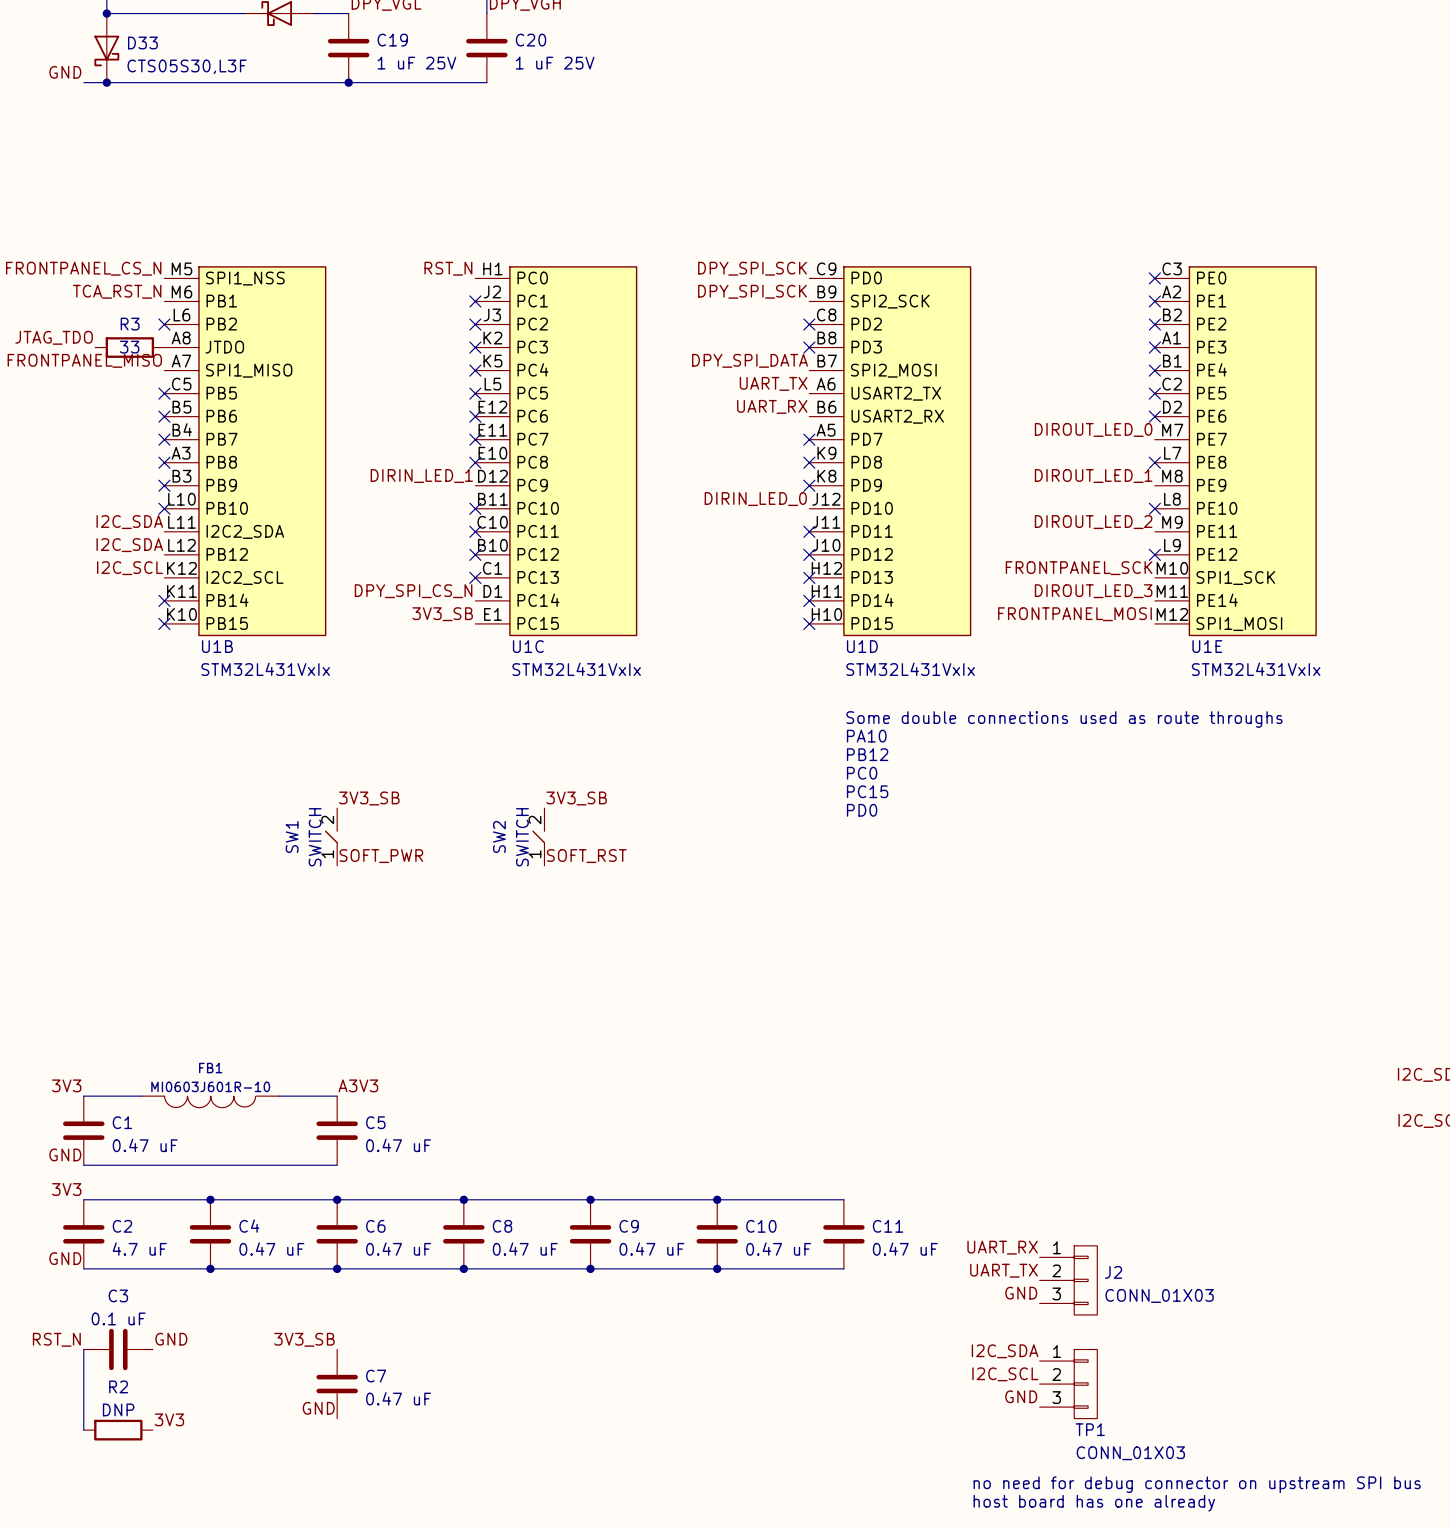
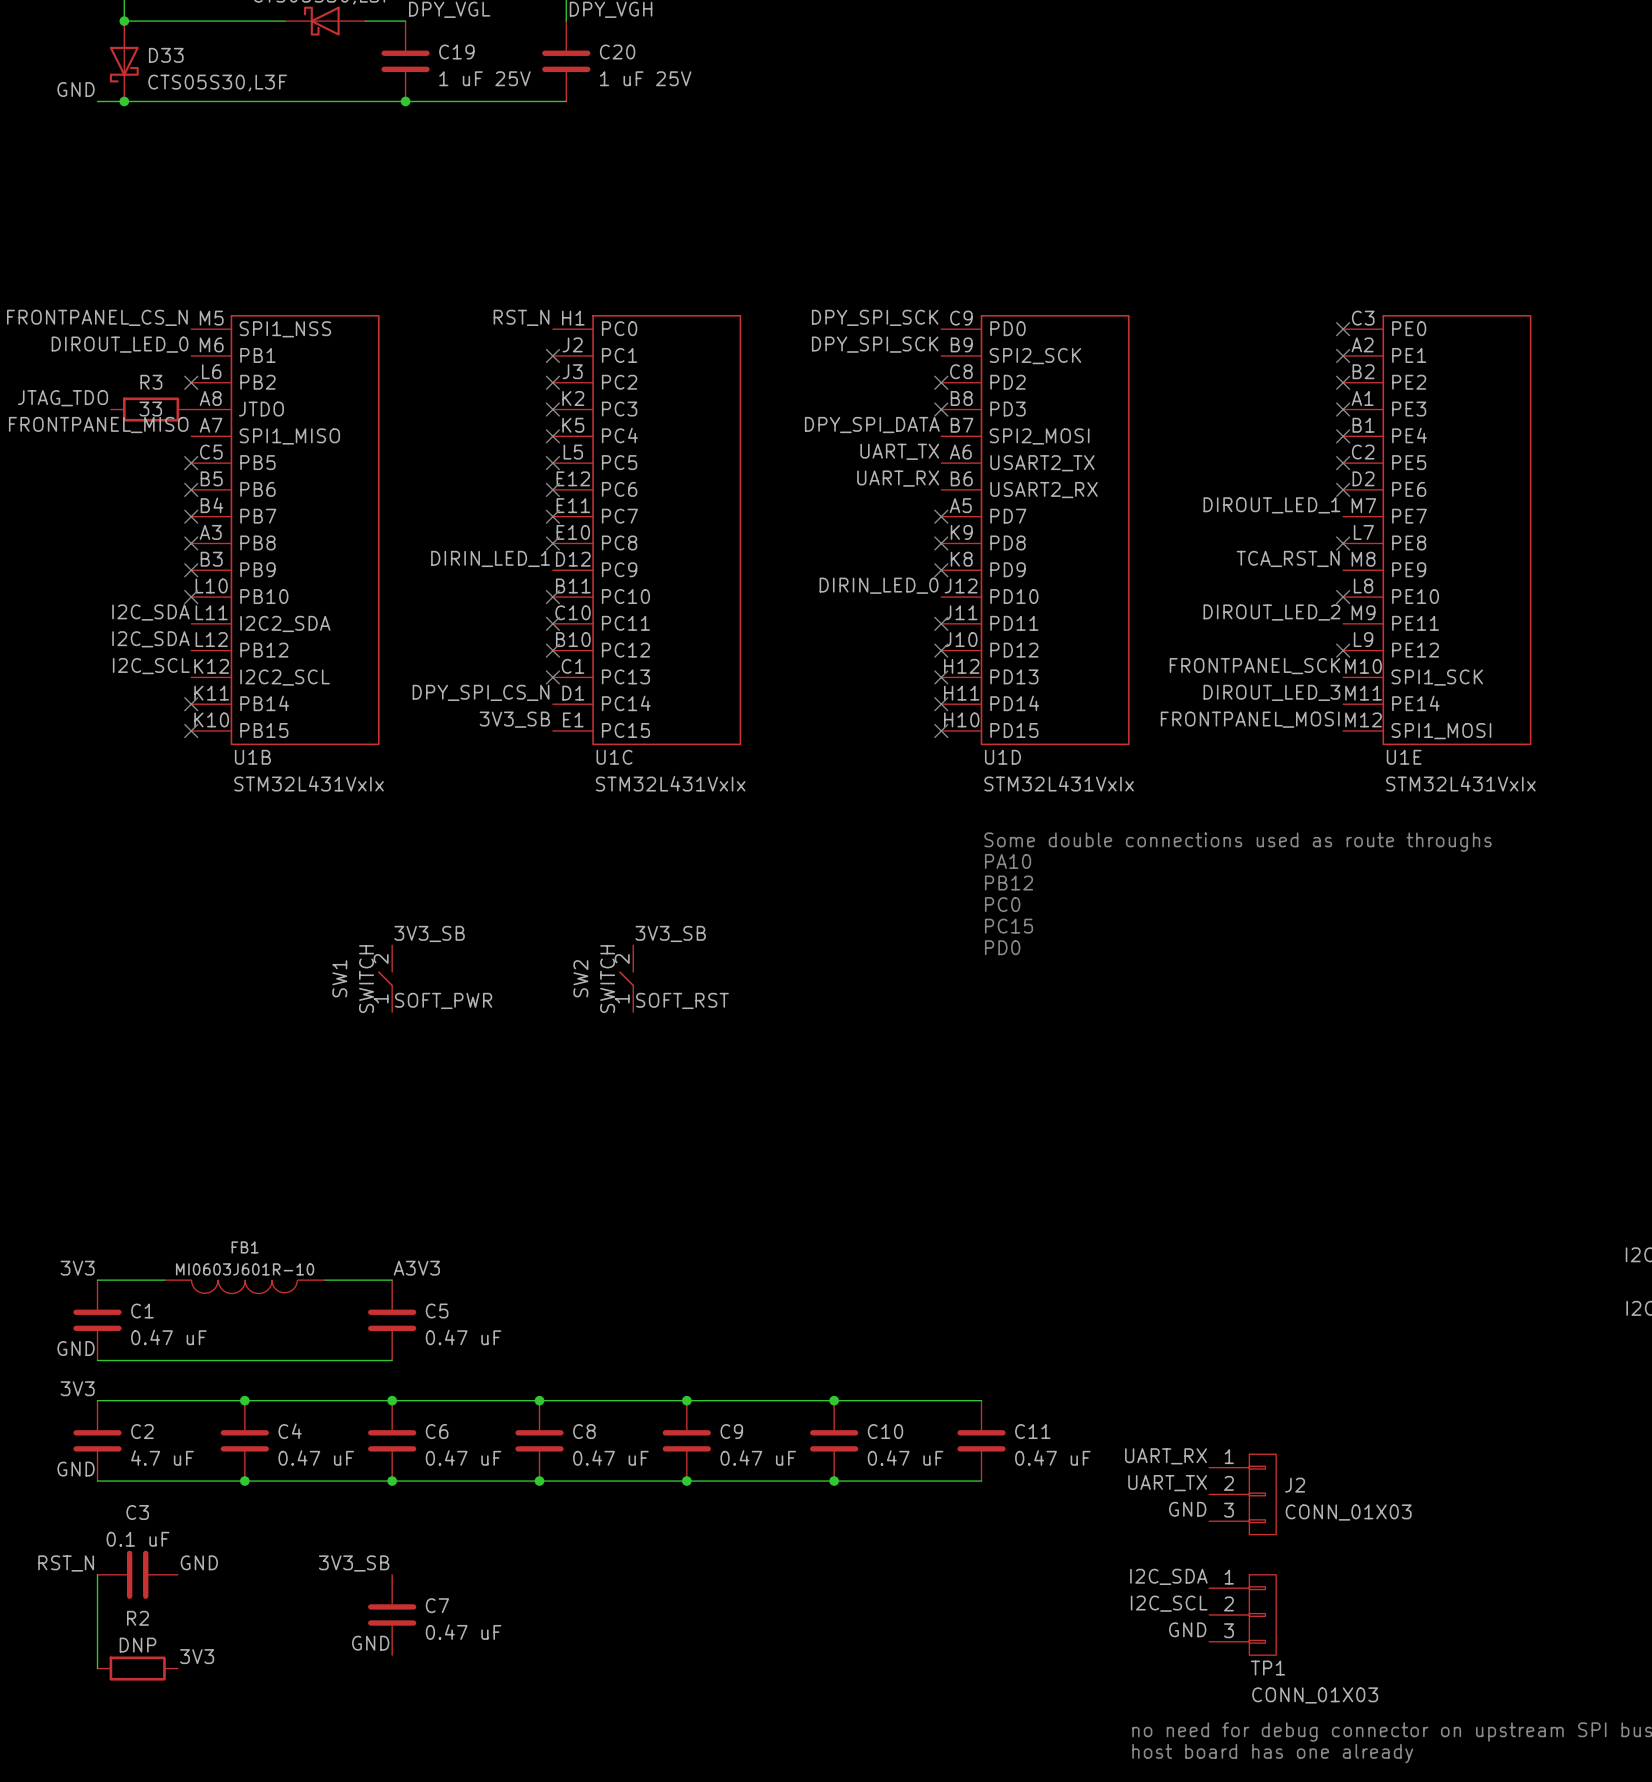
label: TCA_RST_N (117, 291) -> DIROUT_LED_0 (120, 344)
label: DIROUT_LED_0 (1093, 429) -> DIROUT_LED_1 (1271, 505)
label: DIROUT_LED_1 (1093, 476) -> TCA_RST_N (1288, 558)

